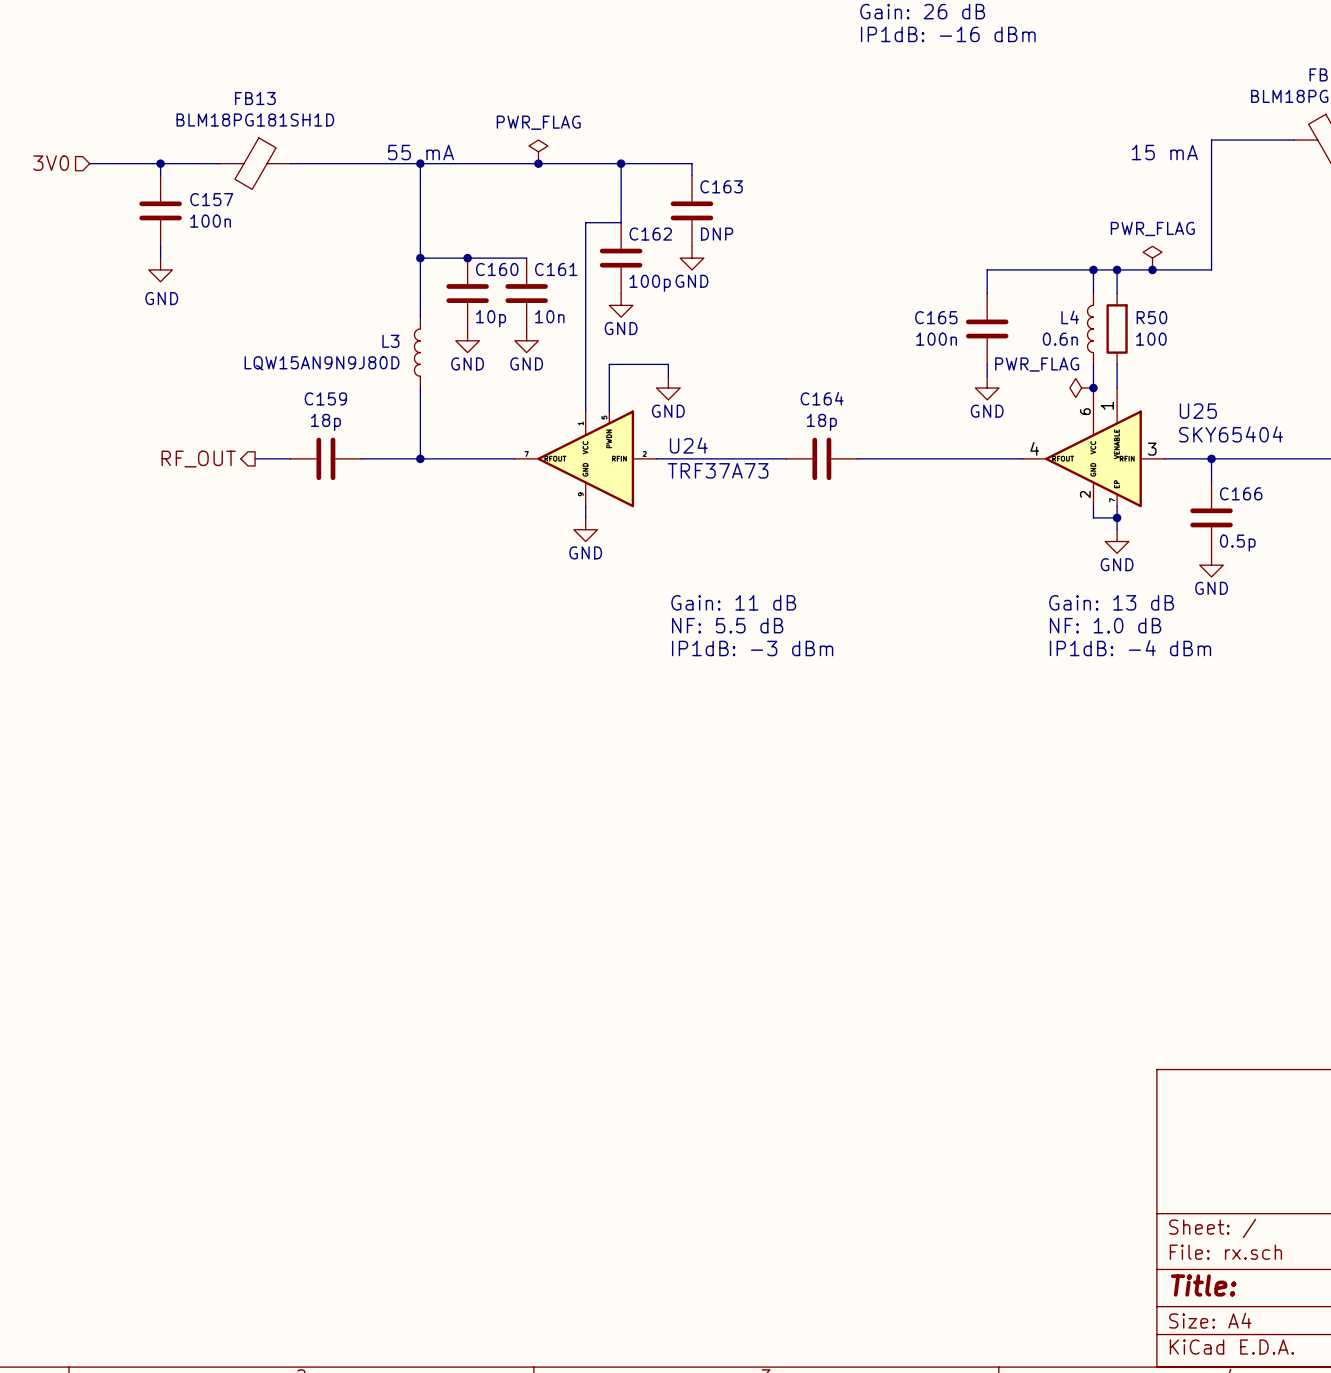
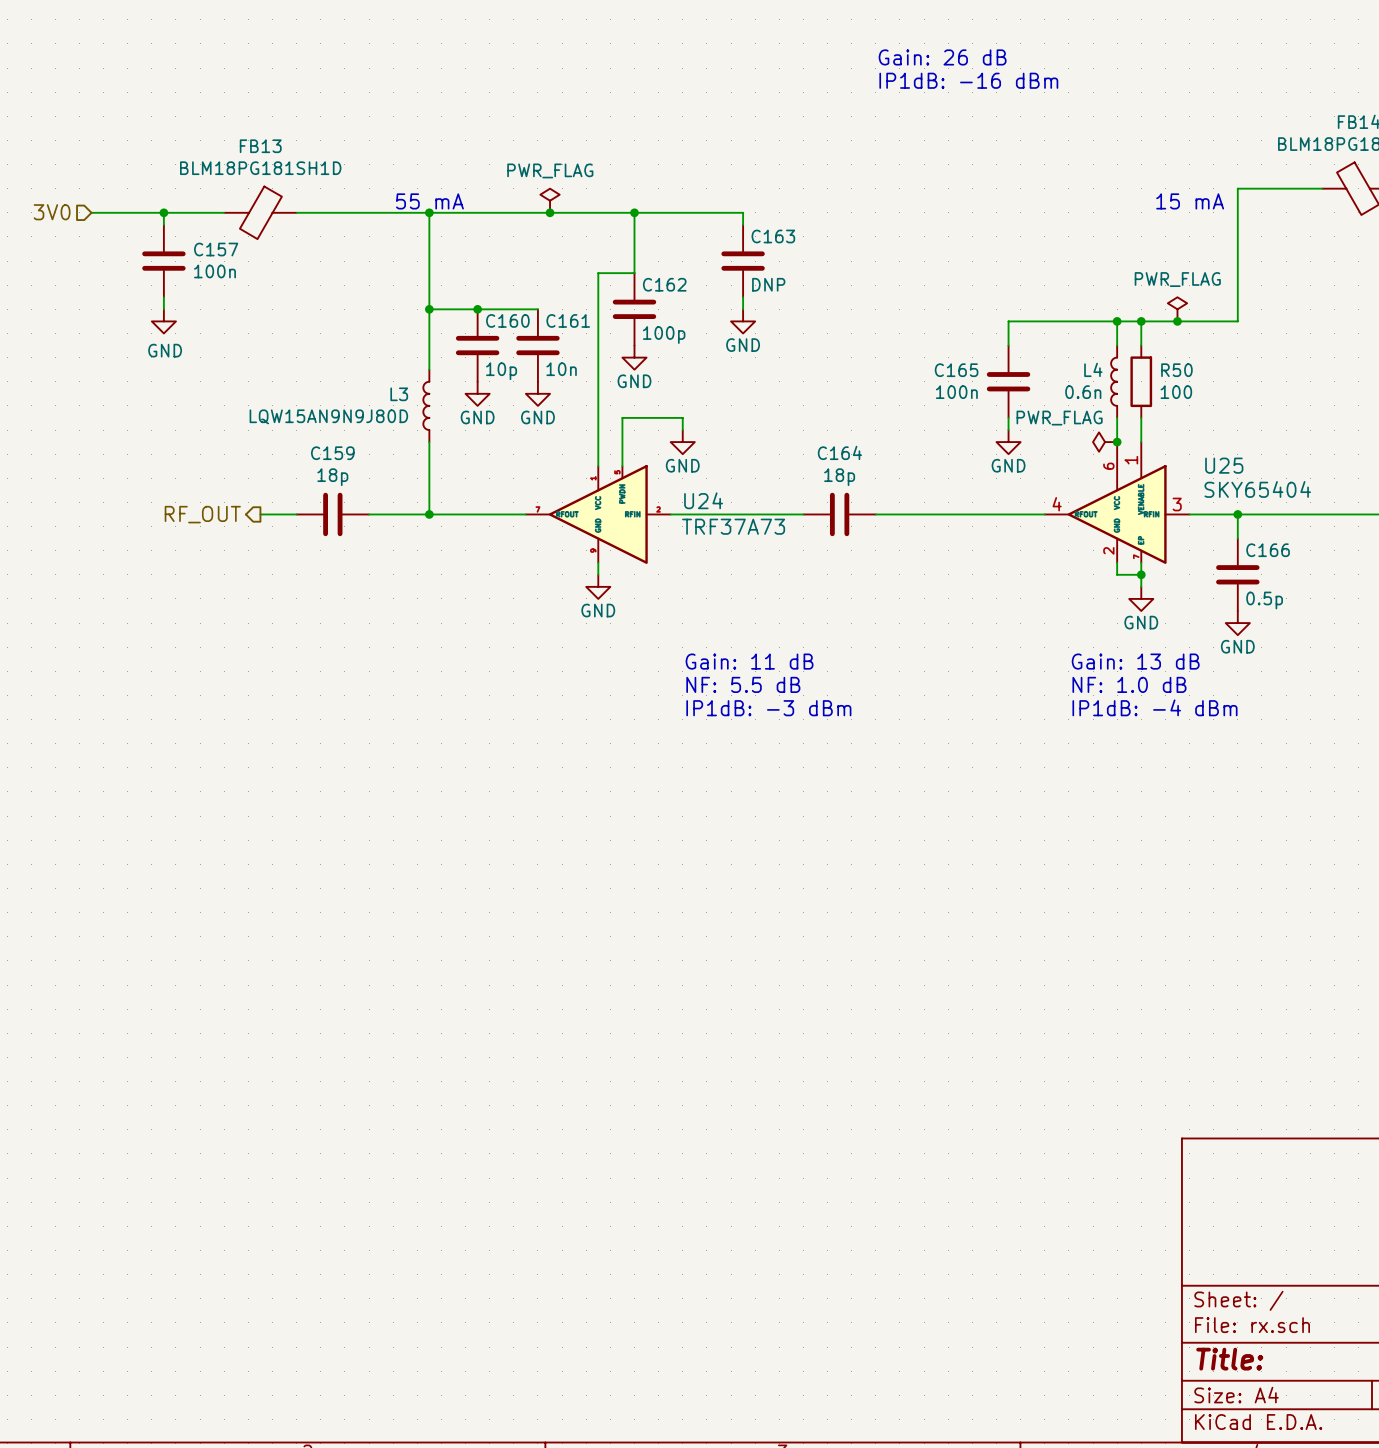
wire: (691, 163) (691, 175) -> (706, 212) (743, 212) (743, 224)
C163 position: (691, 210) -> (743, 261)
wire: none -> (743, 297) (743, 309)
power symbol position: GND (691, 258) -> GND (743, 321)

